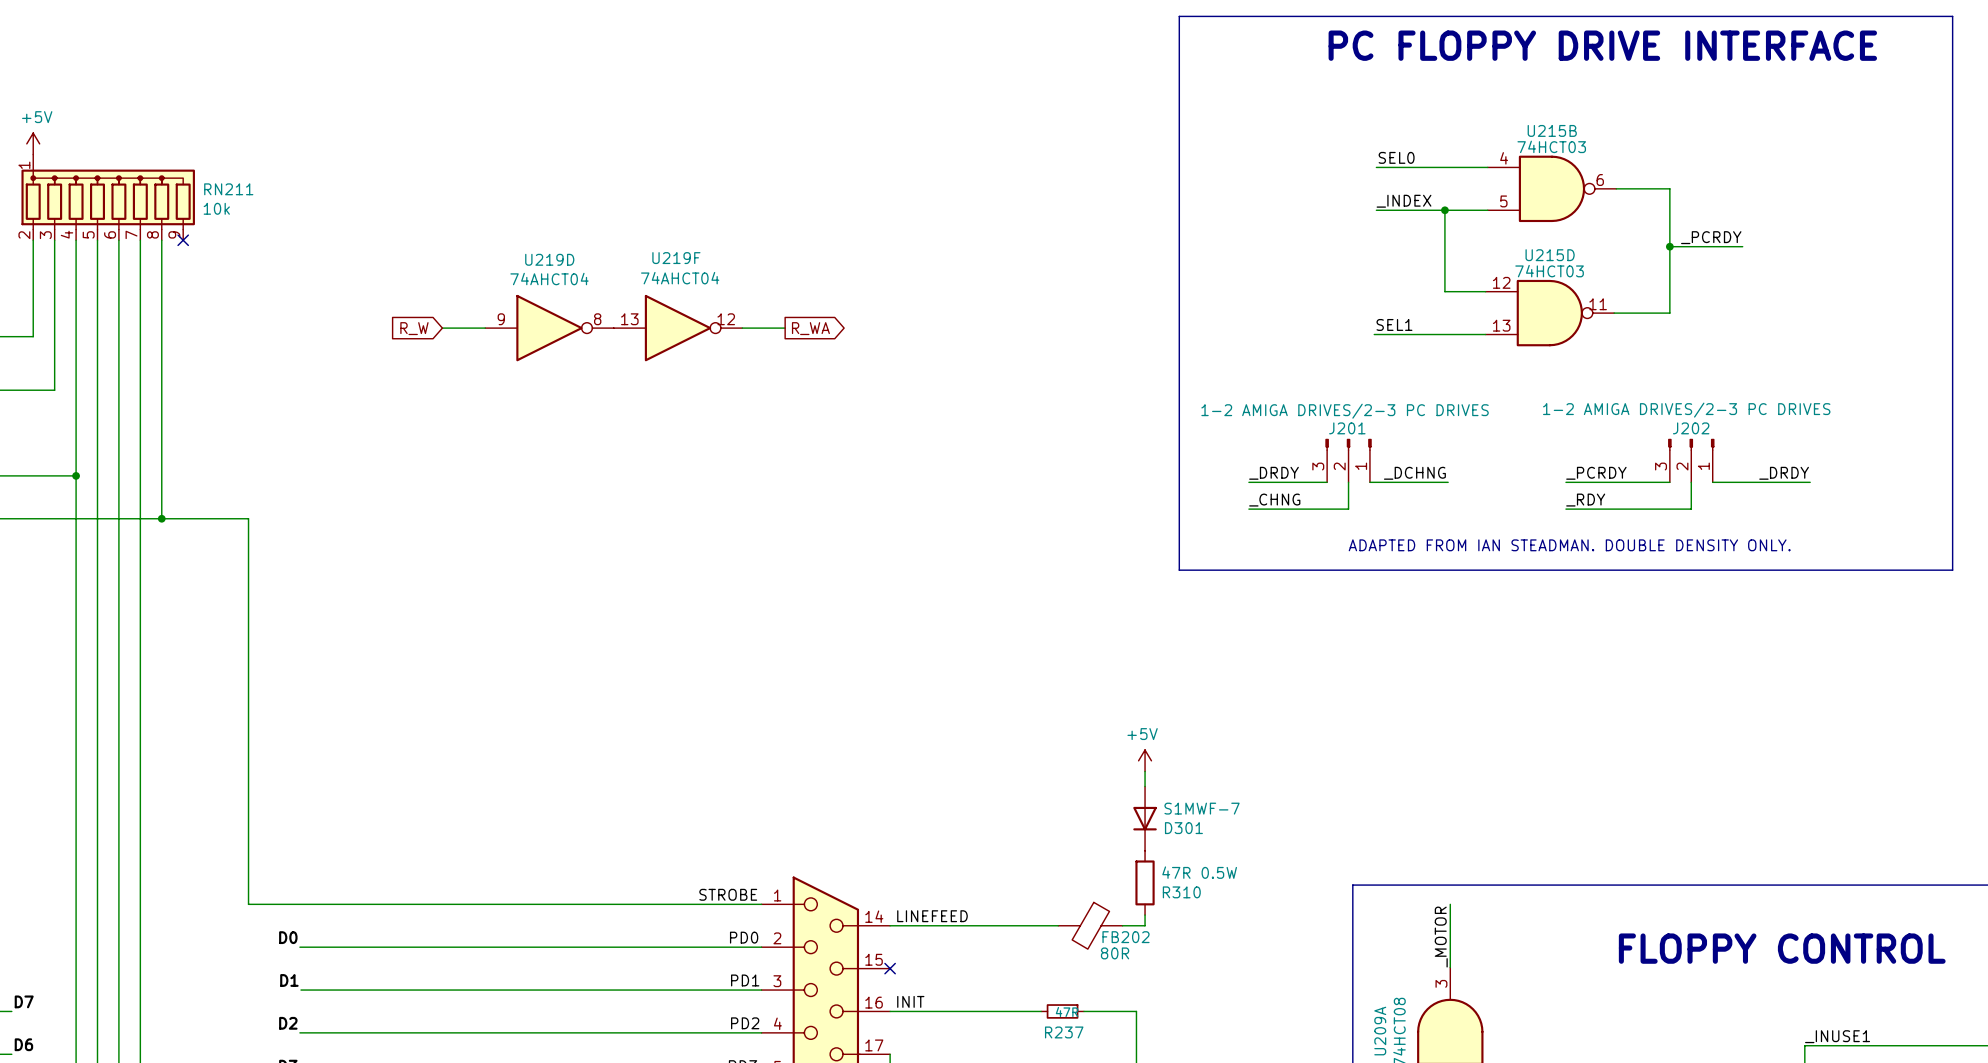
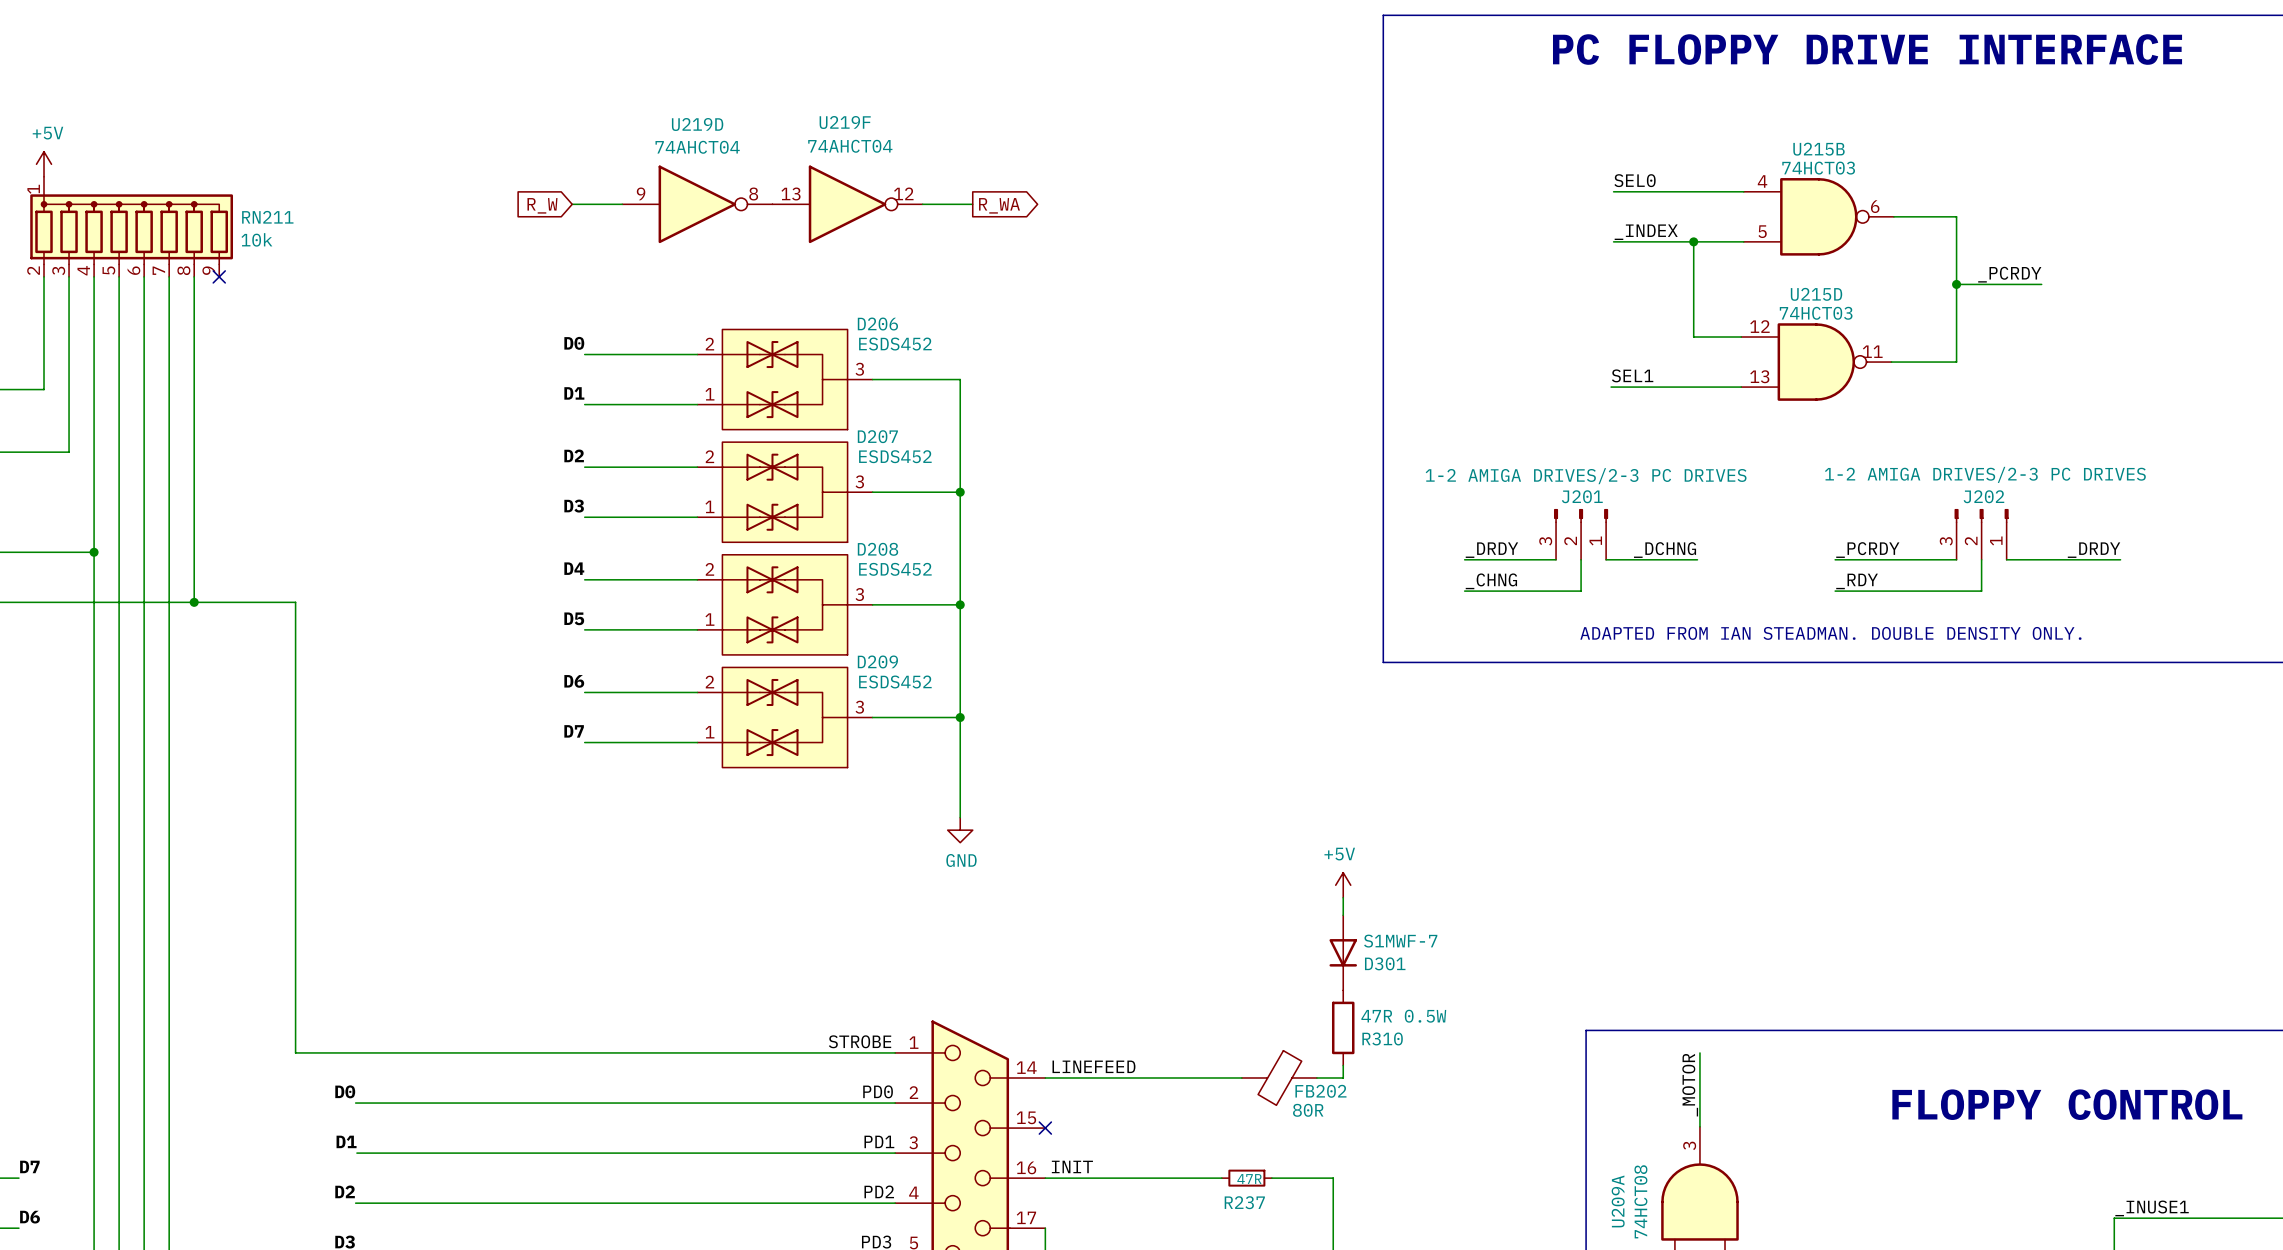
wire: none -> (922, 204) (972, 204)
label: none -> D0 (574, 343)
wire: none -> (584, 354) (697, 354)
global label position: R_W (414, 328) -> R_W (542, 205)
wire: (442, 328) (485, 328) -> (572, 204) (622, 204)
U219D position: (549, 328) -> (697, 204)
D206: none -> ESDS452 (784, 379)
U219F position: (678, 328) -> (847, 204)
wire: none -> (922, 379) (960, 379) (960, 817)
global label position: R_WA (810, 328) -> R_WA (999, 205)
label: none -> D1 (574, 393)
wire: none -> (584, 404) (697, 404)
label: none -> D2 (574, 455)
wire: none -> (584, 467) (697, 467)
D207: none -> ESDS452 (784, 492)
wire: none -> (872, 492) (960, 492)
junction: none -> (960, 492)
label: none -> D3 (574, 506)
wire: none -> (584, 517) (697, 517)
label: none -> D4 (574, 568)
wire: none -> (584, 579) (697, 579)
D208: none -> ESDS452 (784, 604)
wire: none -> (872, 604) (960, 604)
junction: none -> (960, 604)
label: none -> D5 (574, 618)
wire: none -> (584, 629) (697, 629)
label: none -> D6 (574, 681)
wire: none -> (584, 692) (697, 692)
D209: none -> ESDS452 (784, 717)
wire: none -> (872, 717) (960, 717)
junction: none -> (960, 717)
label: none -> D7 (574, 731)
wire: none -> (584, 742) (697, 742)
power symbol: none -> GND (960, 830)

